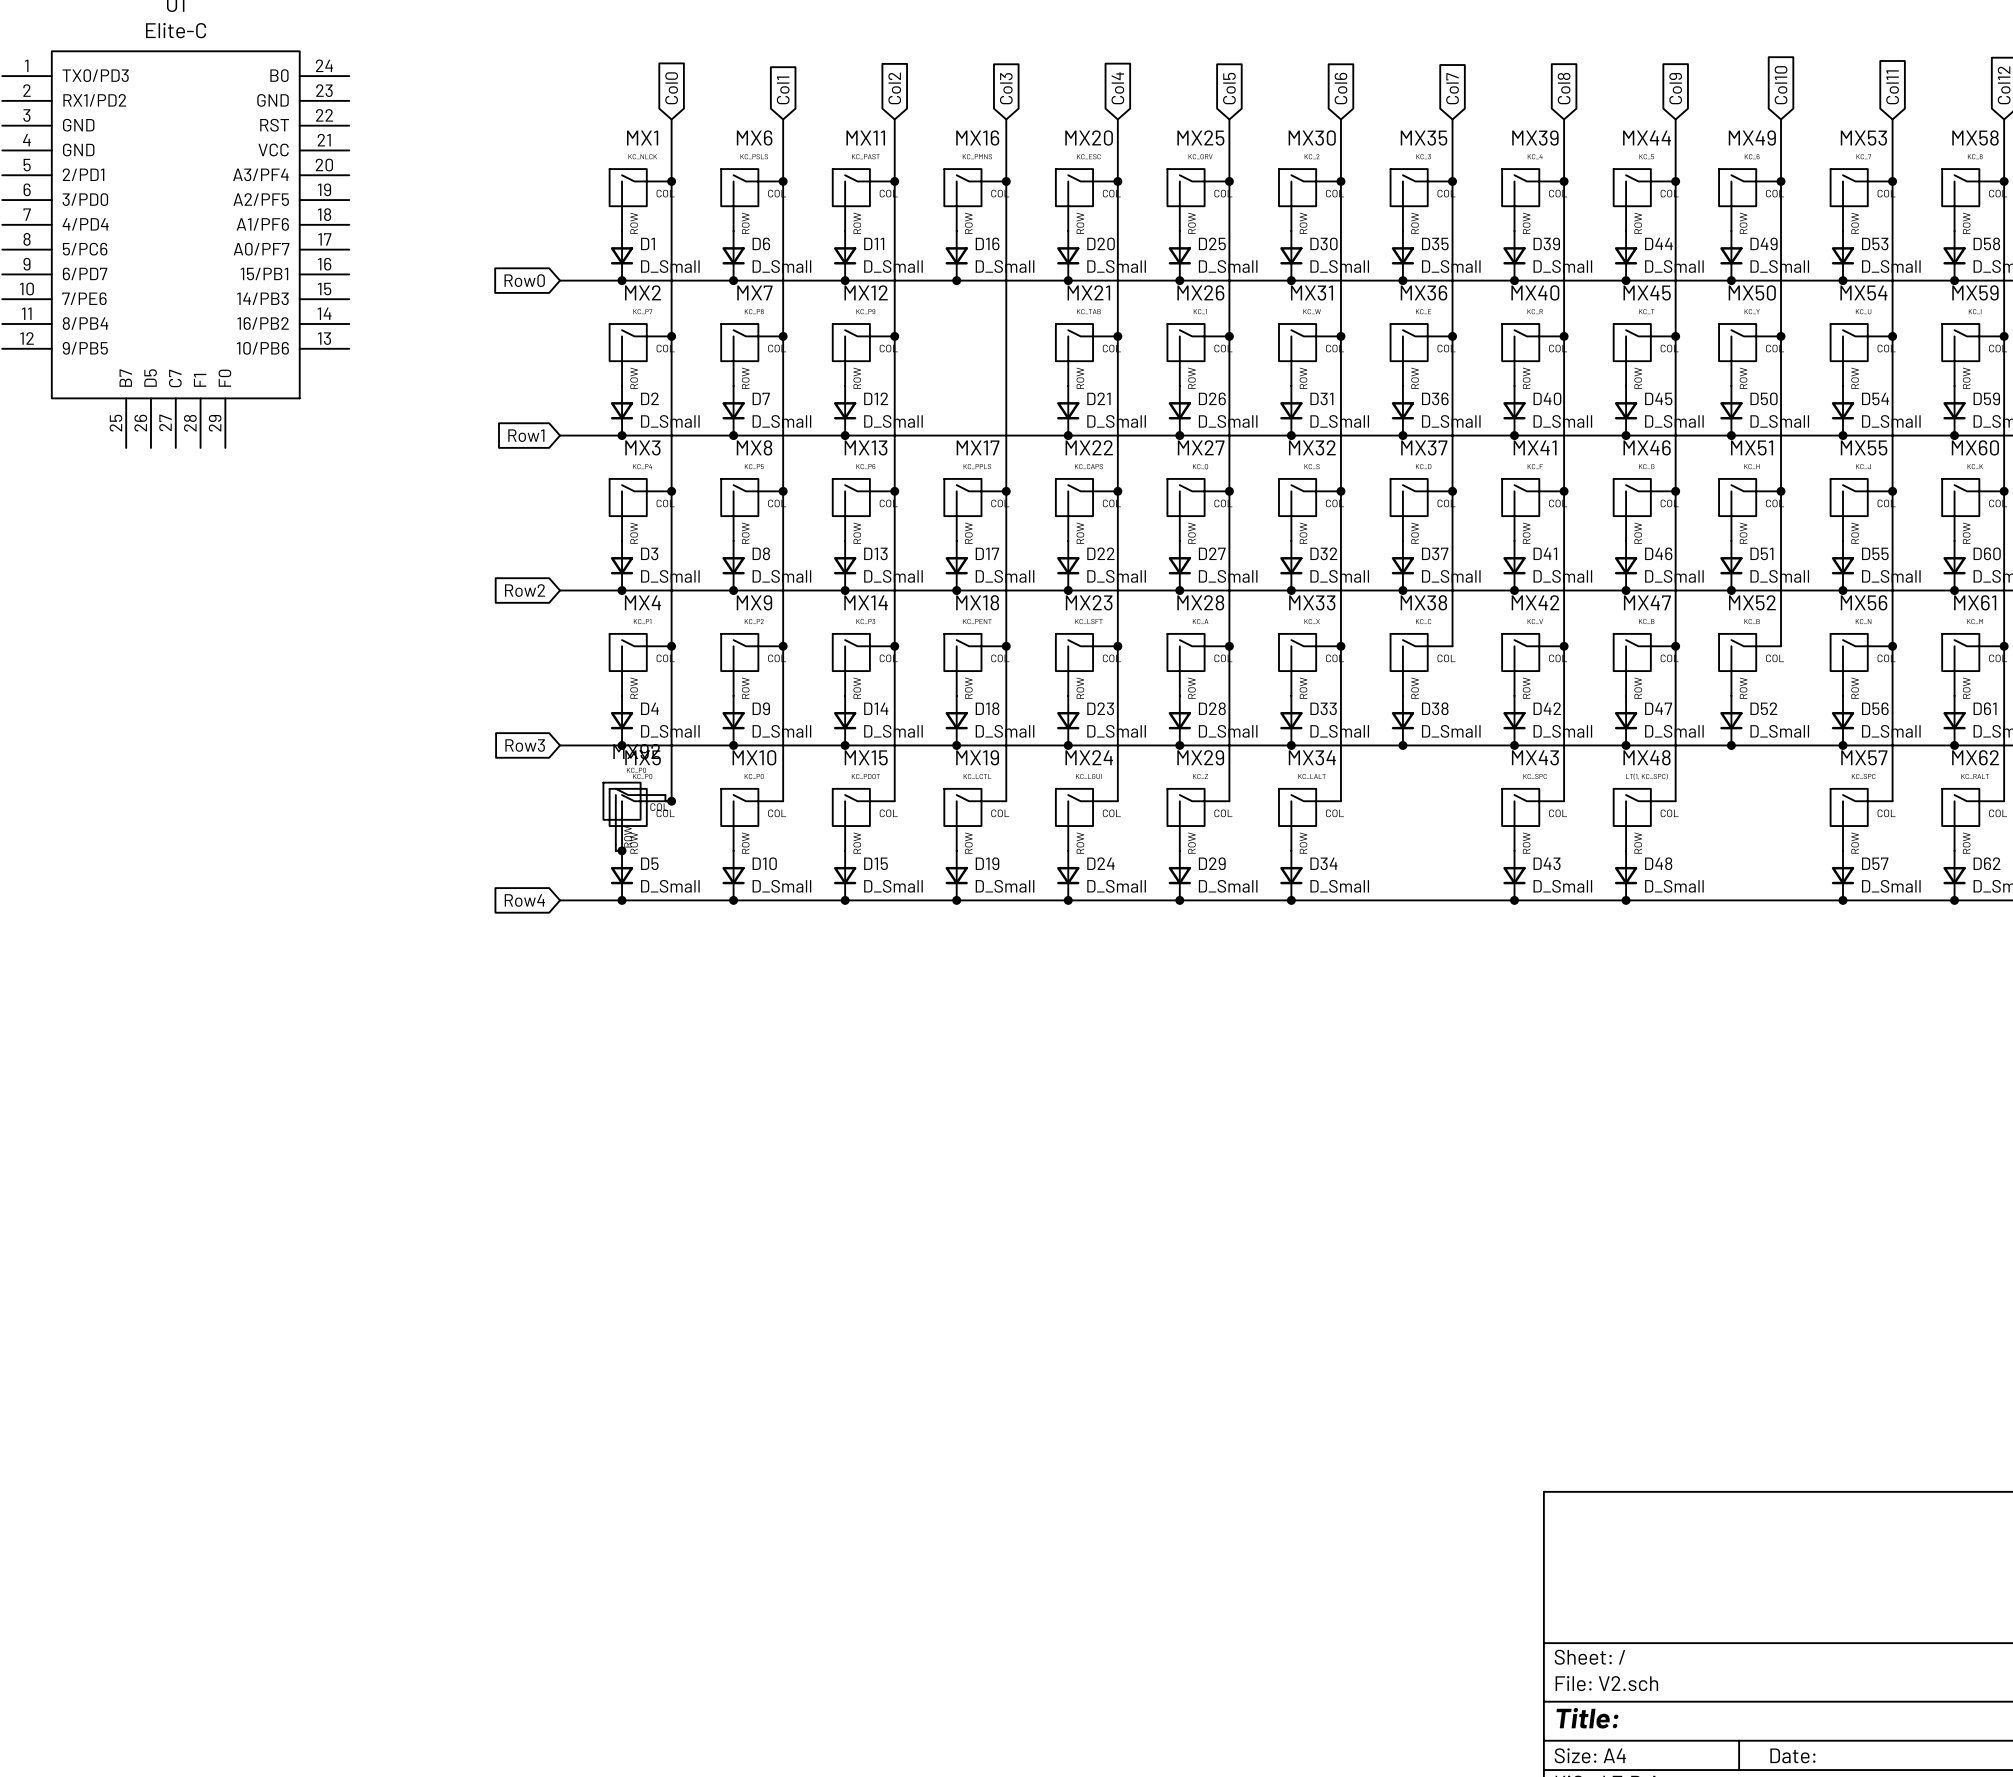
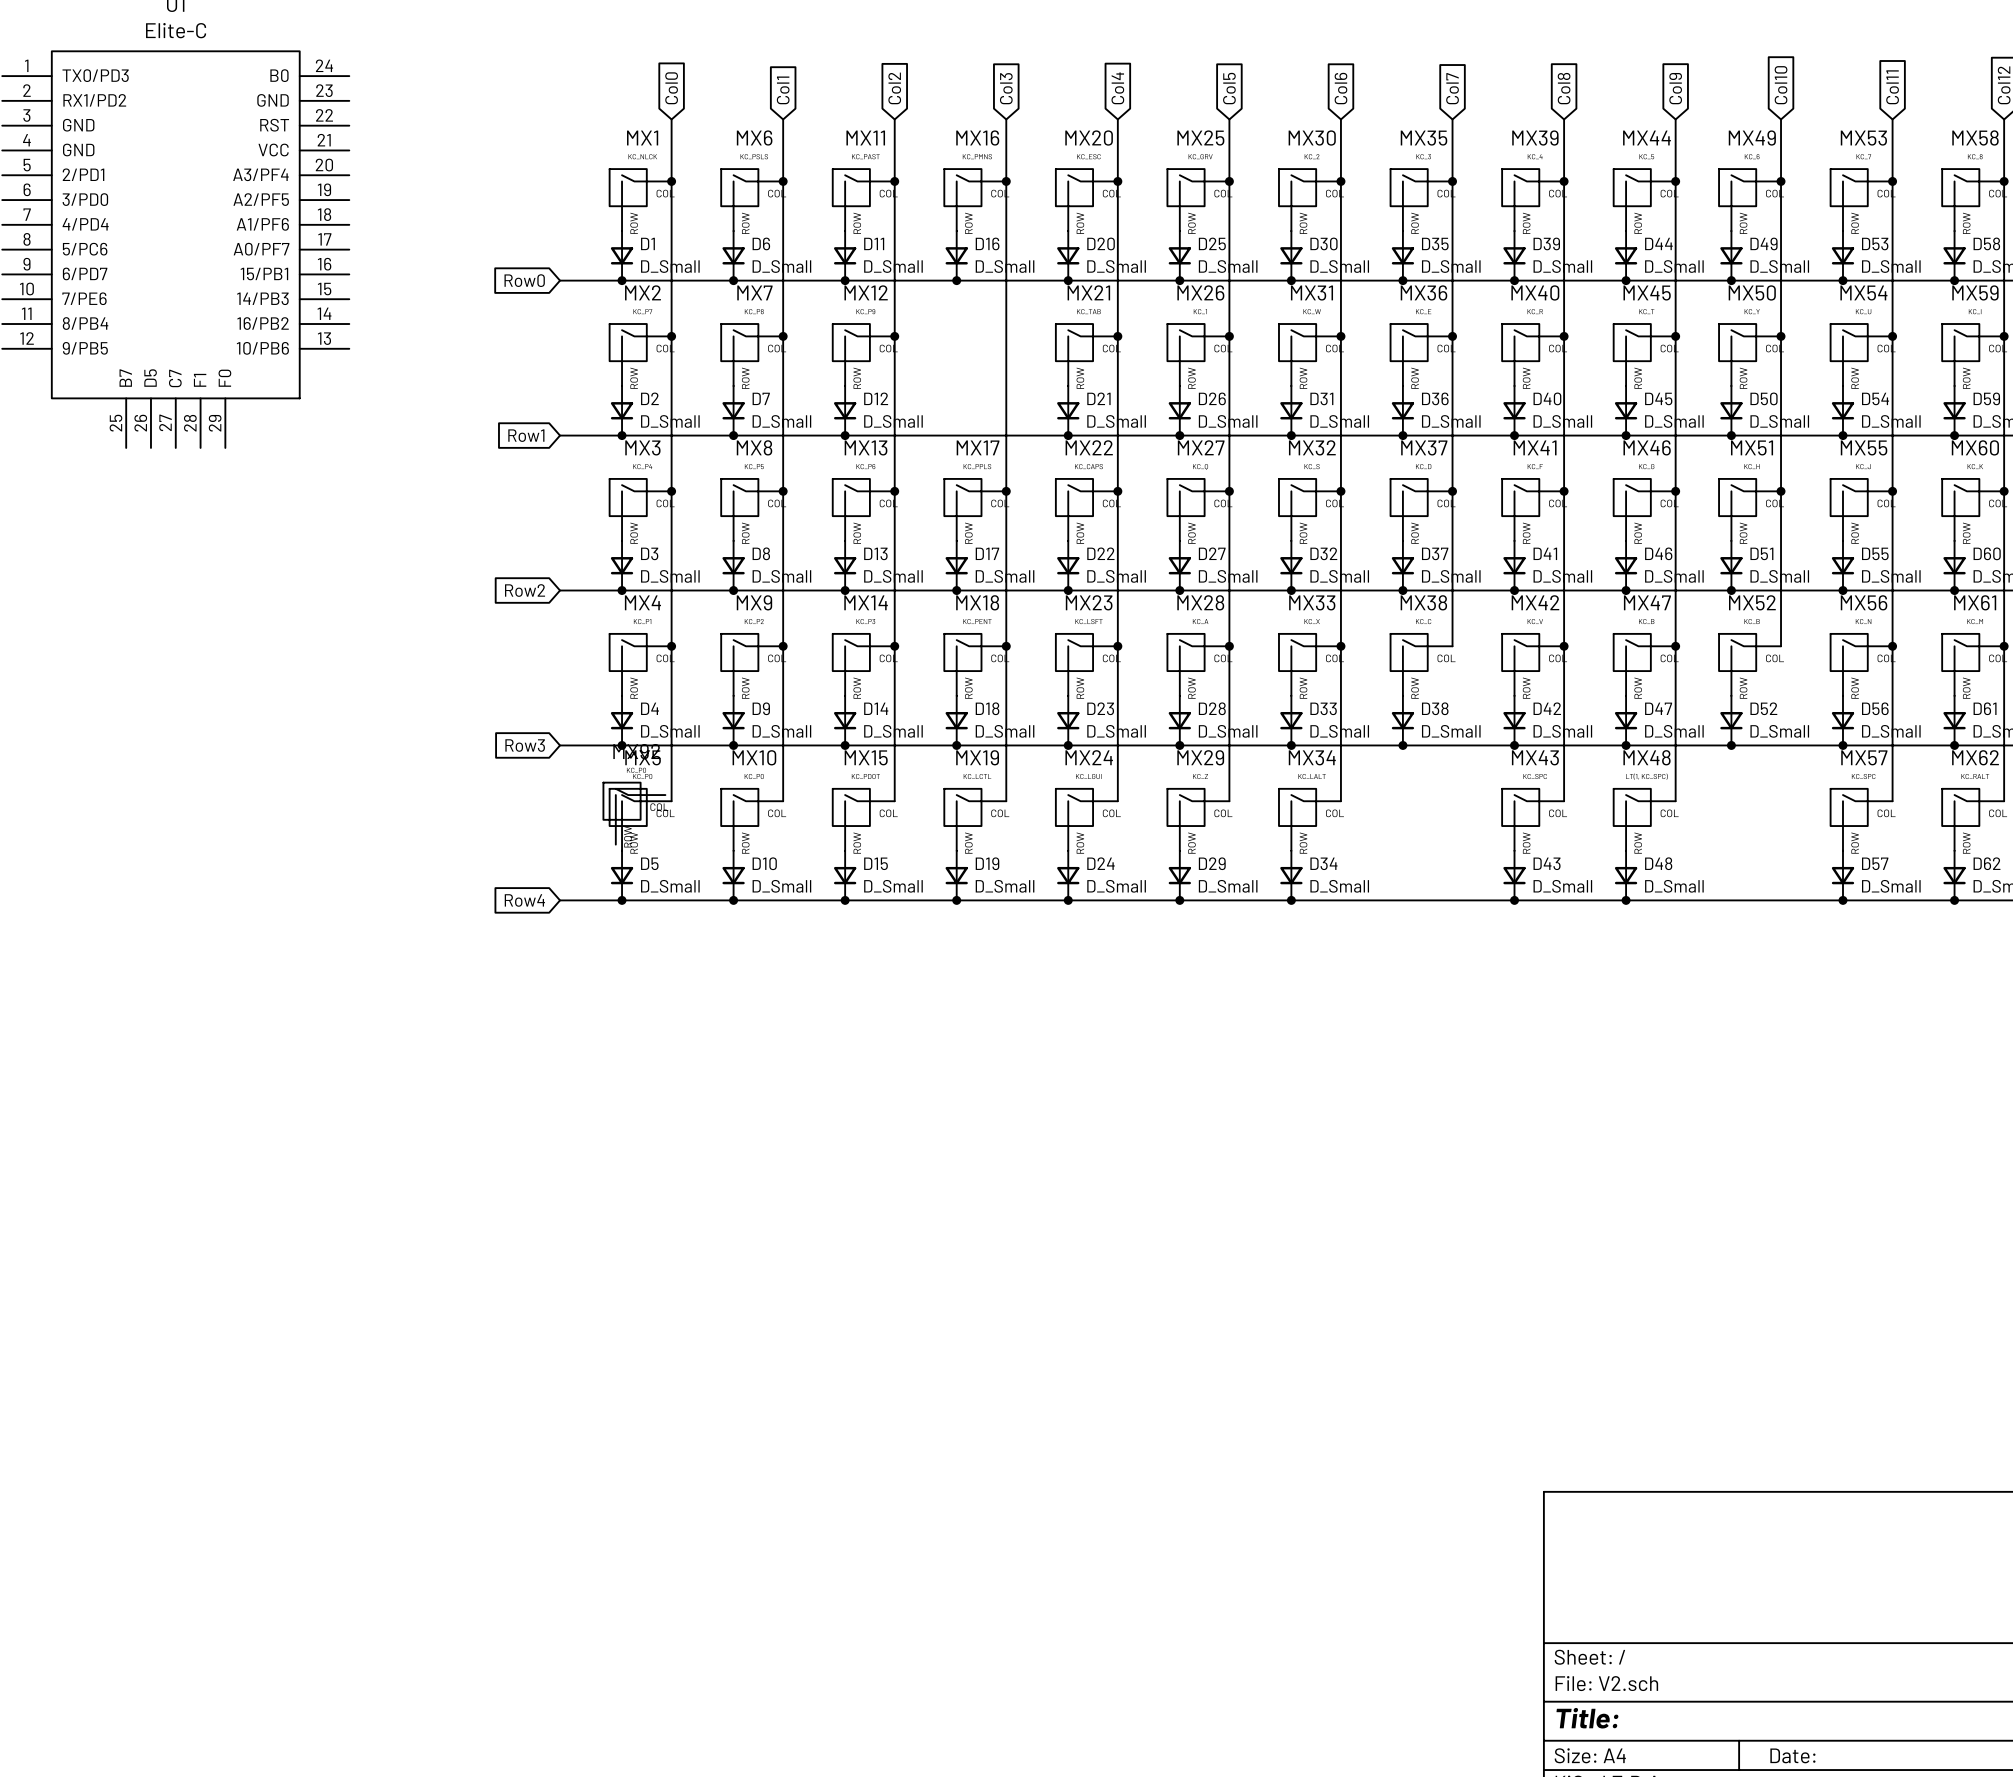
junction: (671, 801) -> none
wire: (615, 844) (615, 850) (622, 850) -> none
junction: (622, 850) -> none

